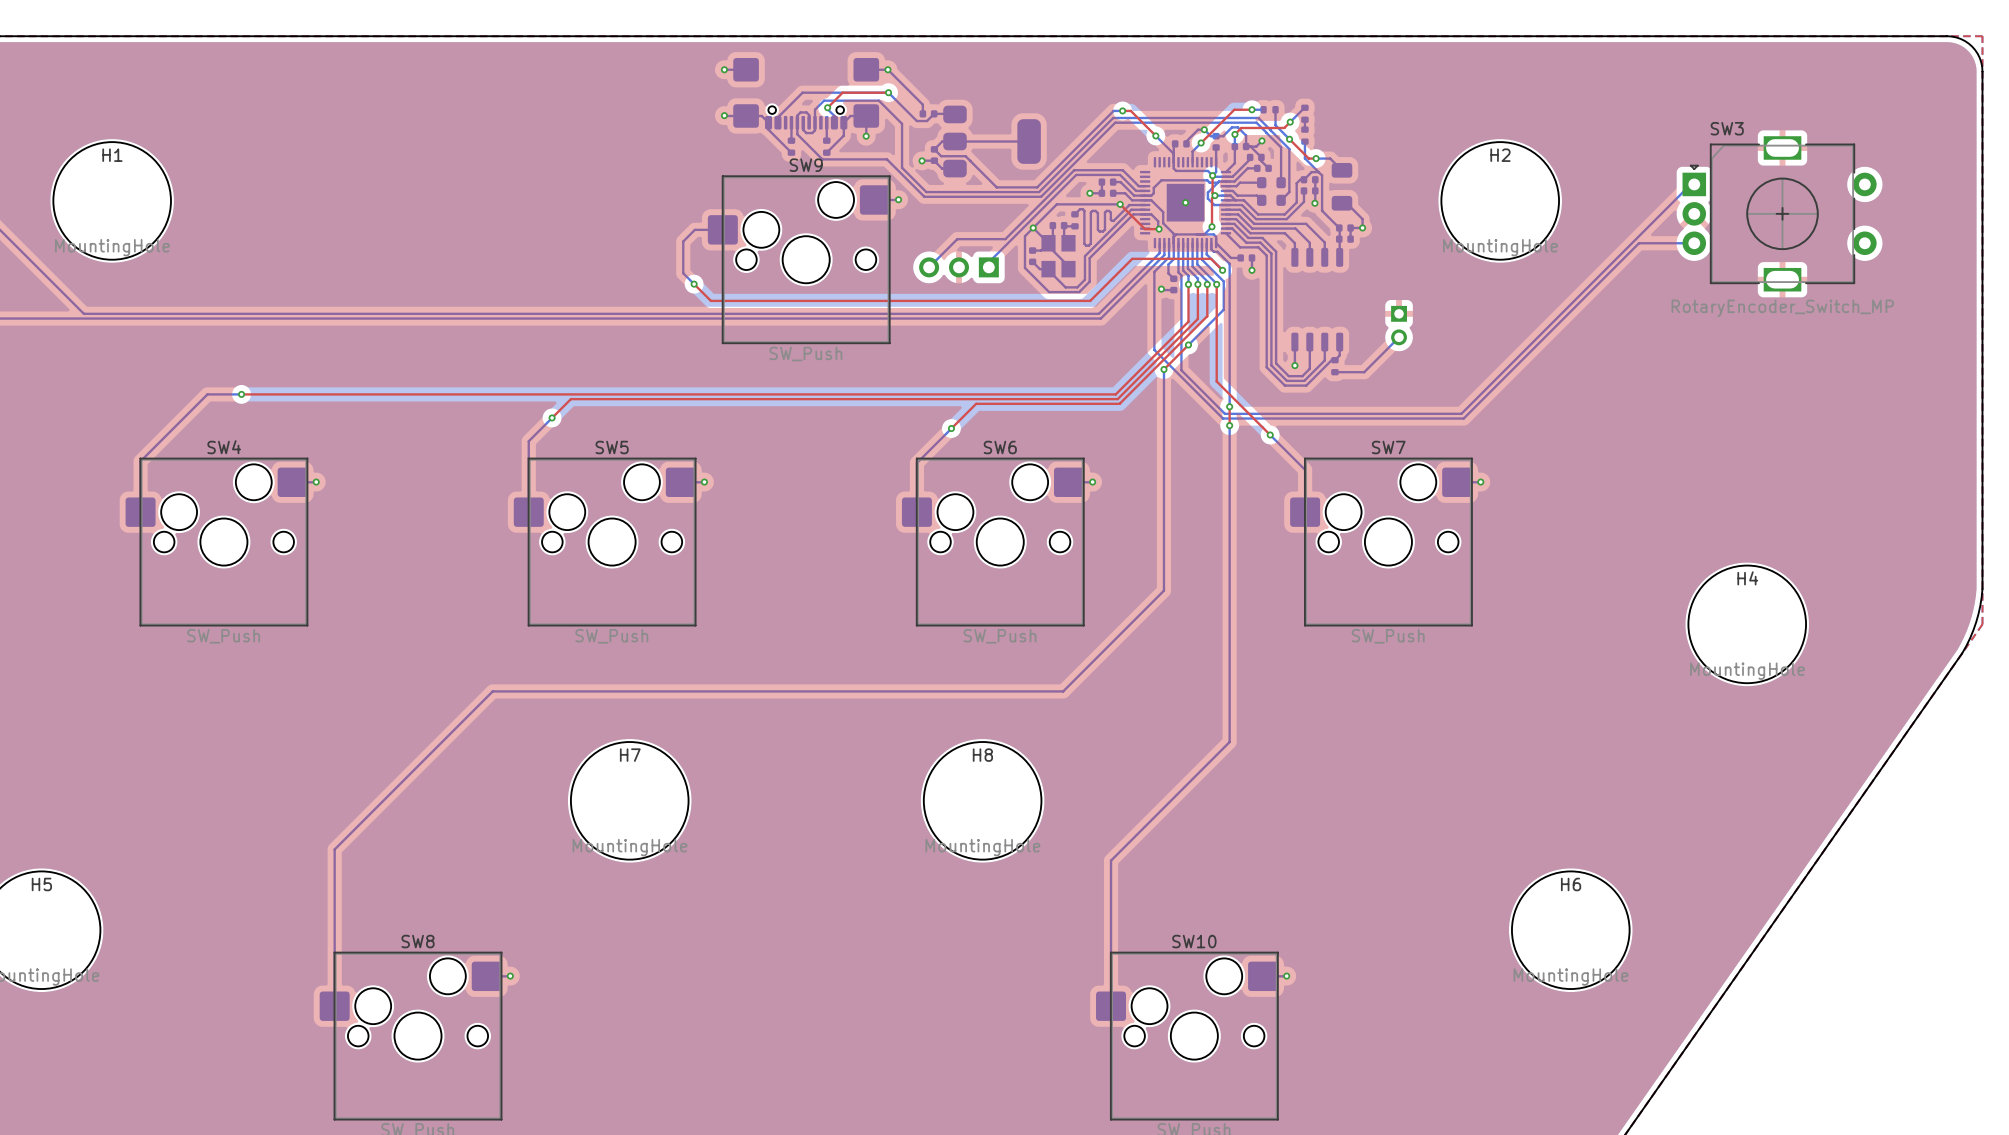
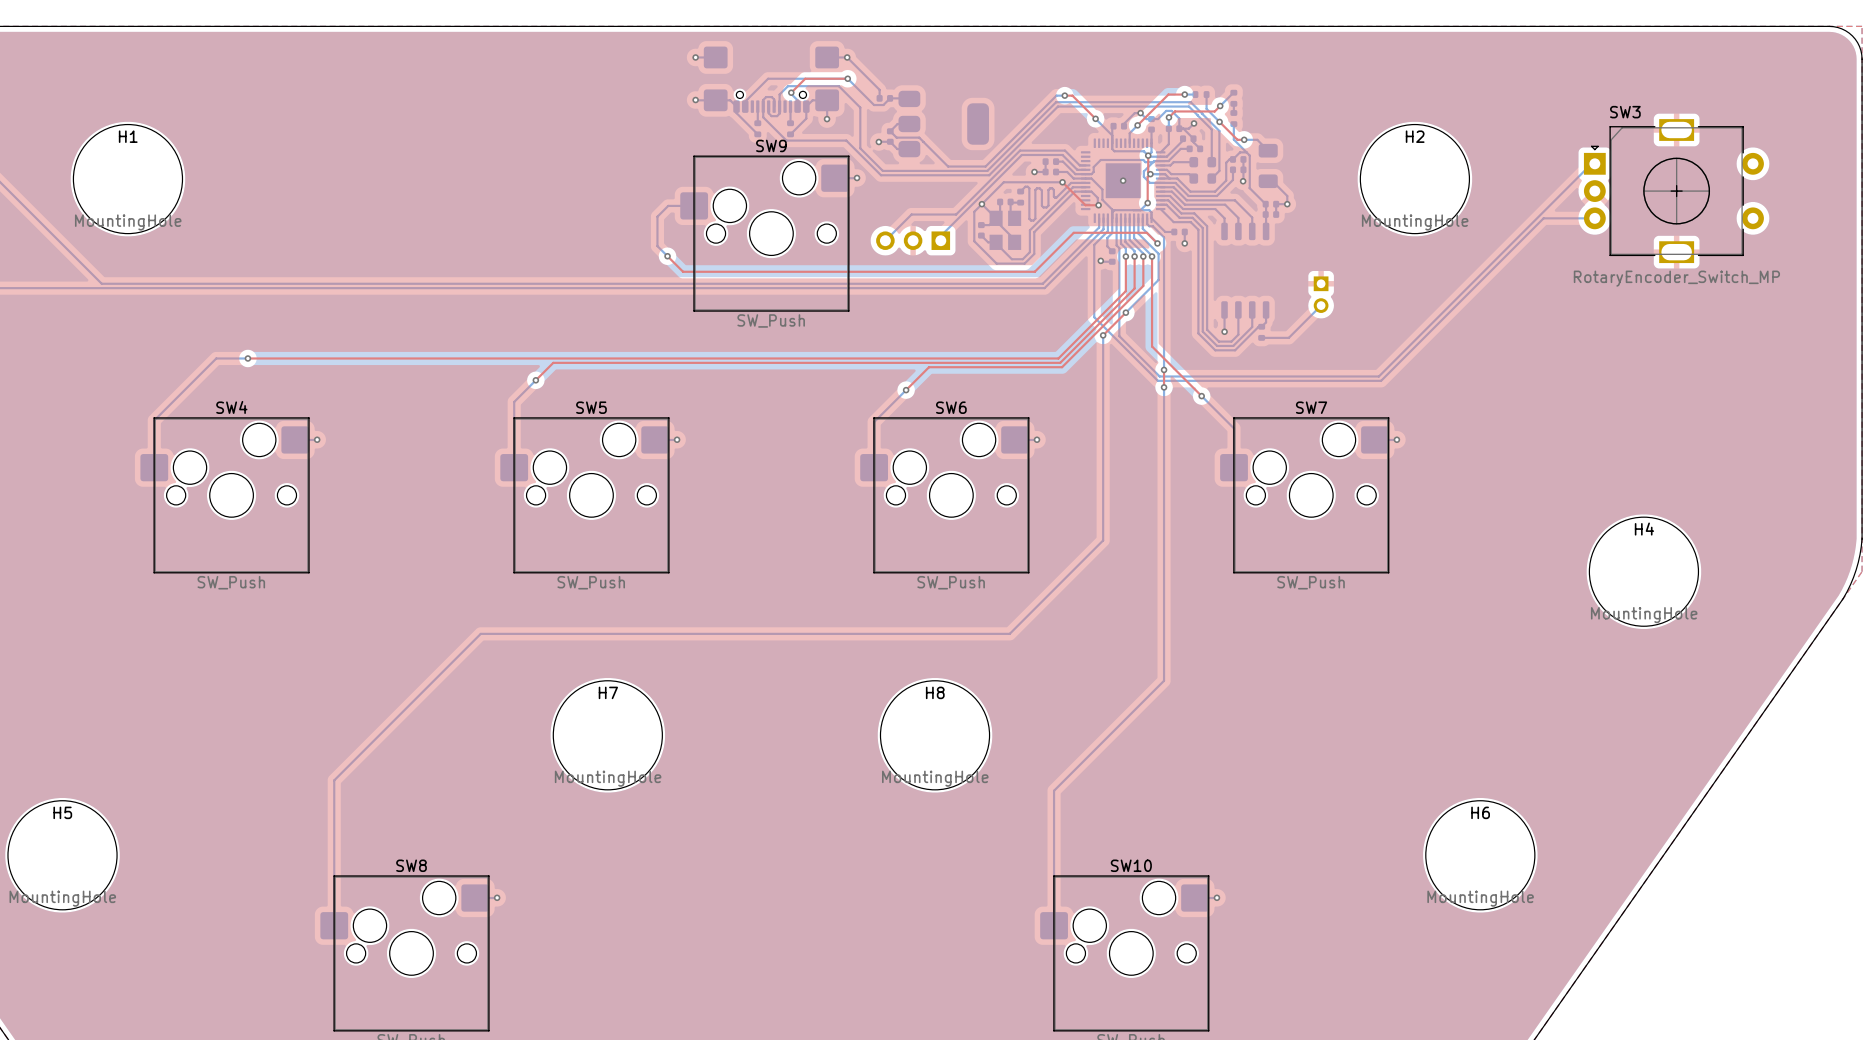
bottom track: (954, 141) (1029, 141) -> none

